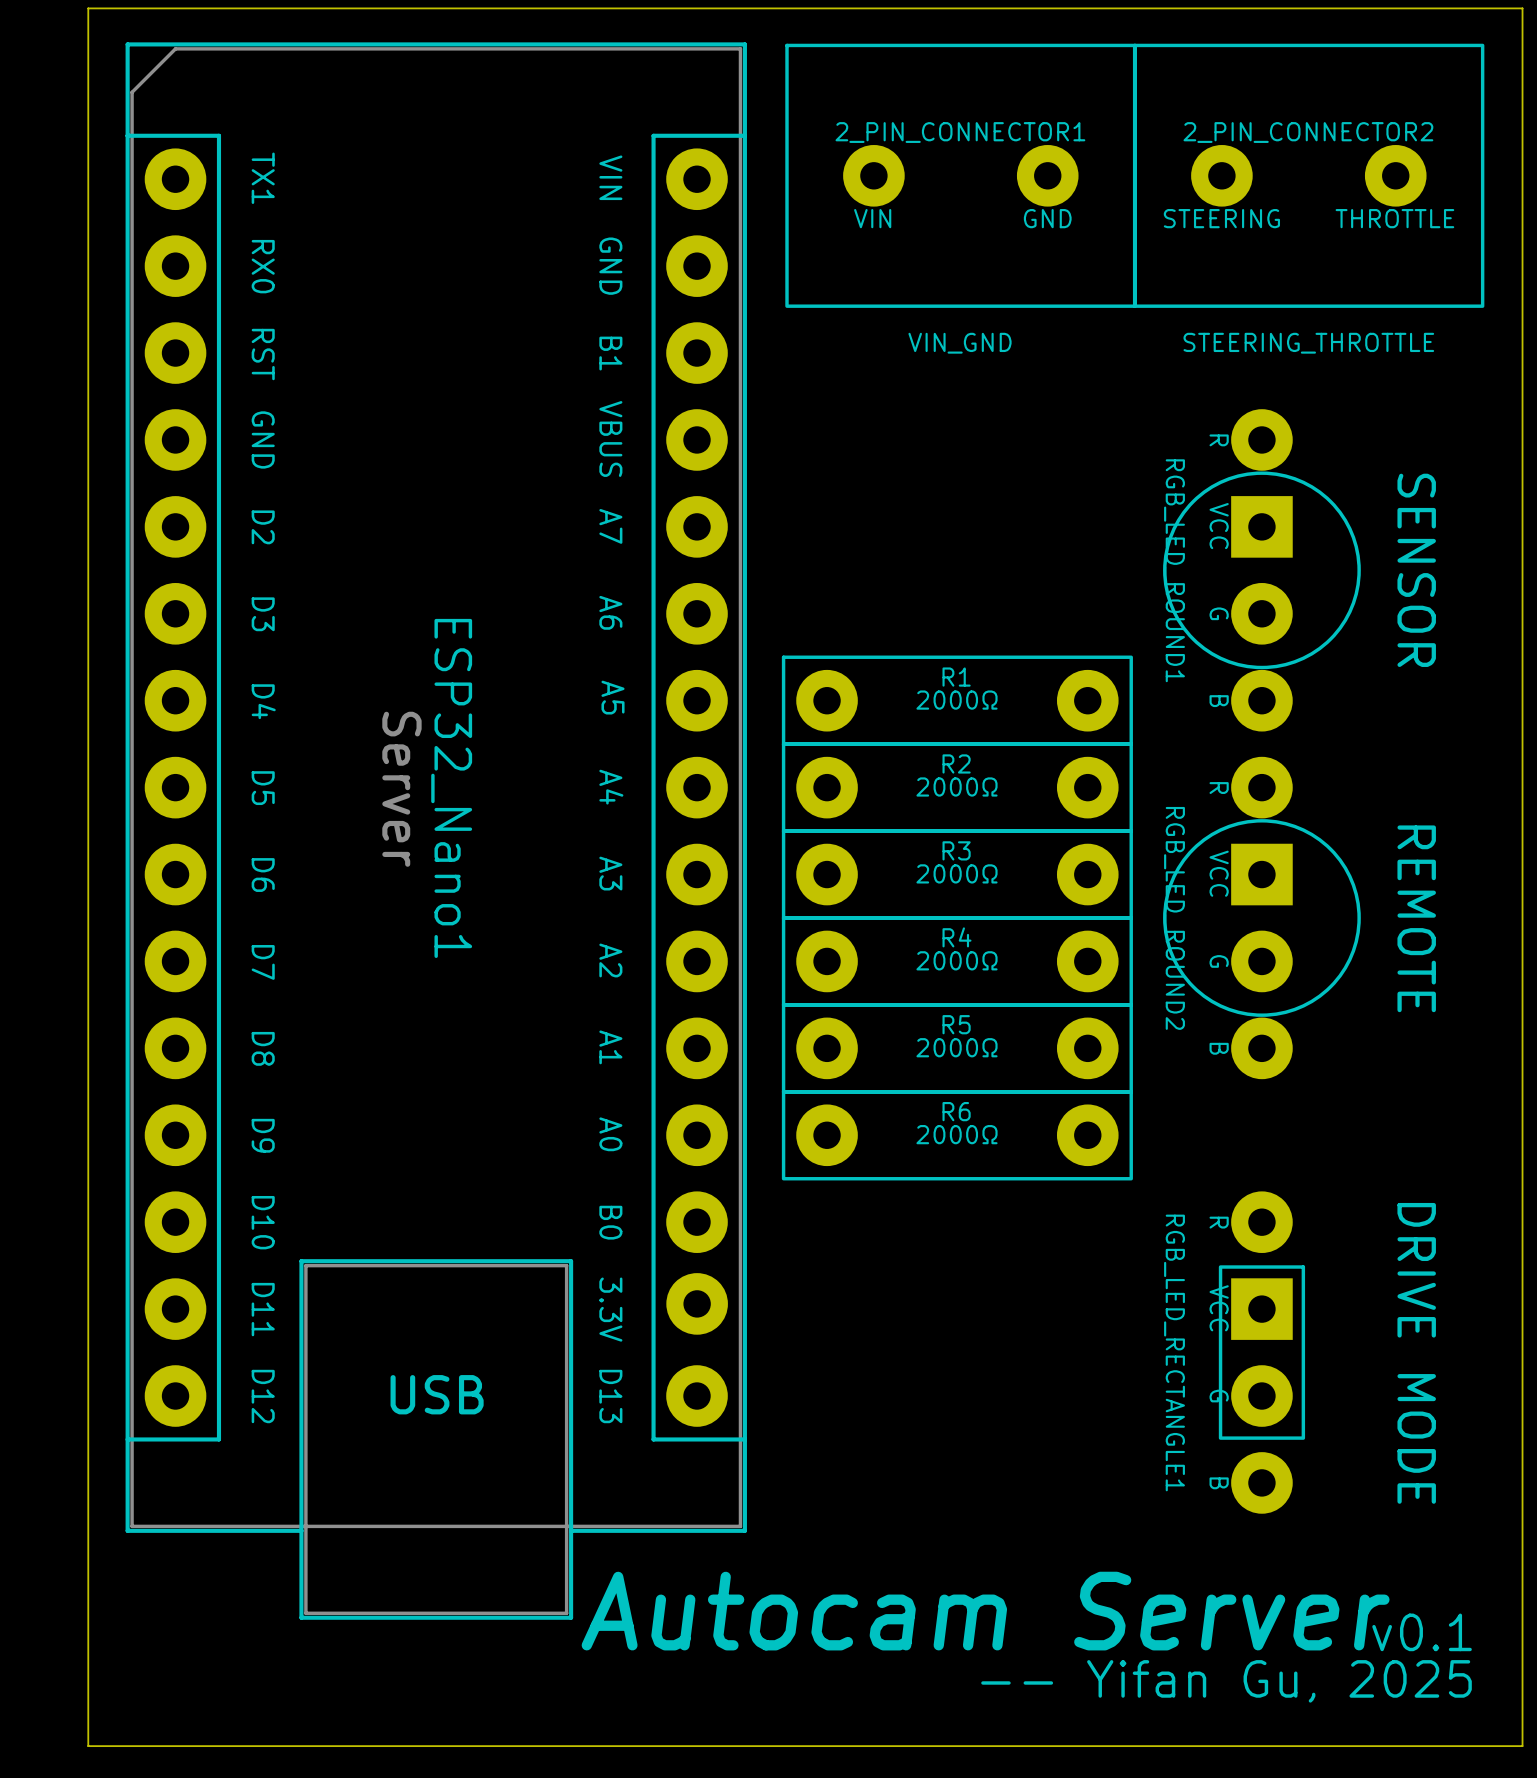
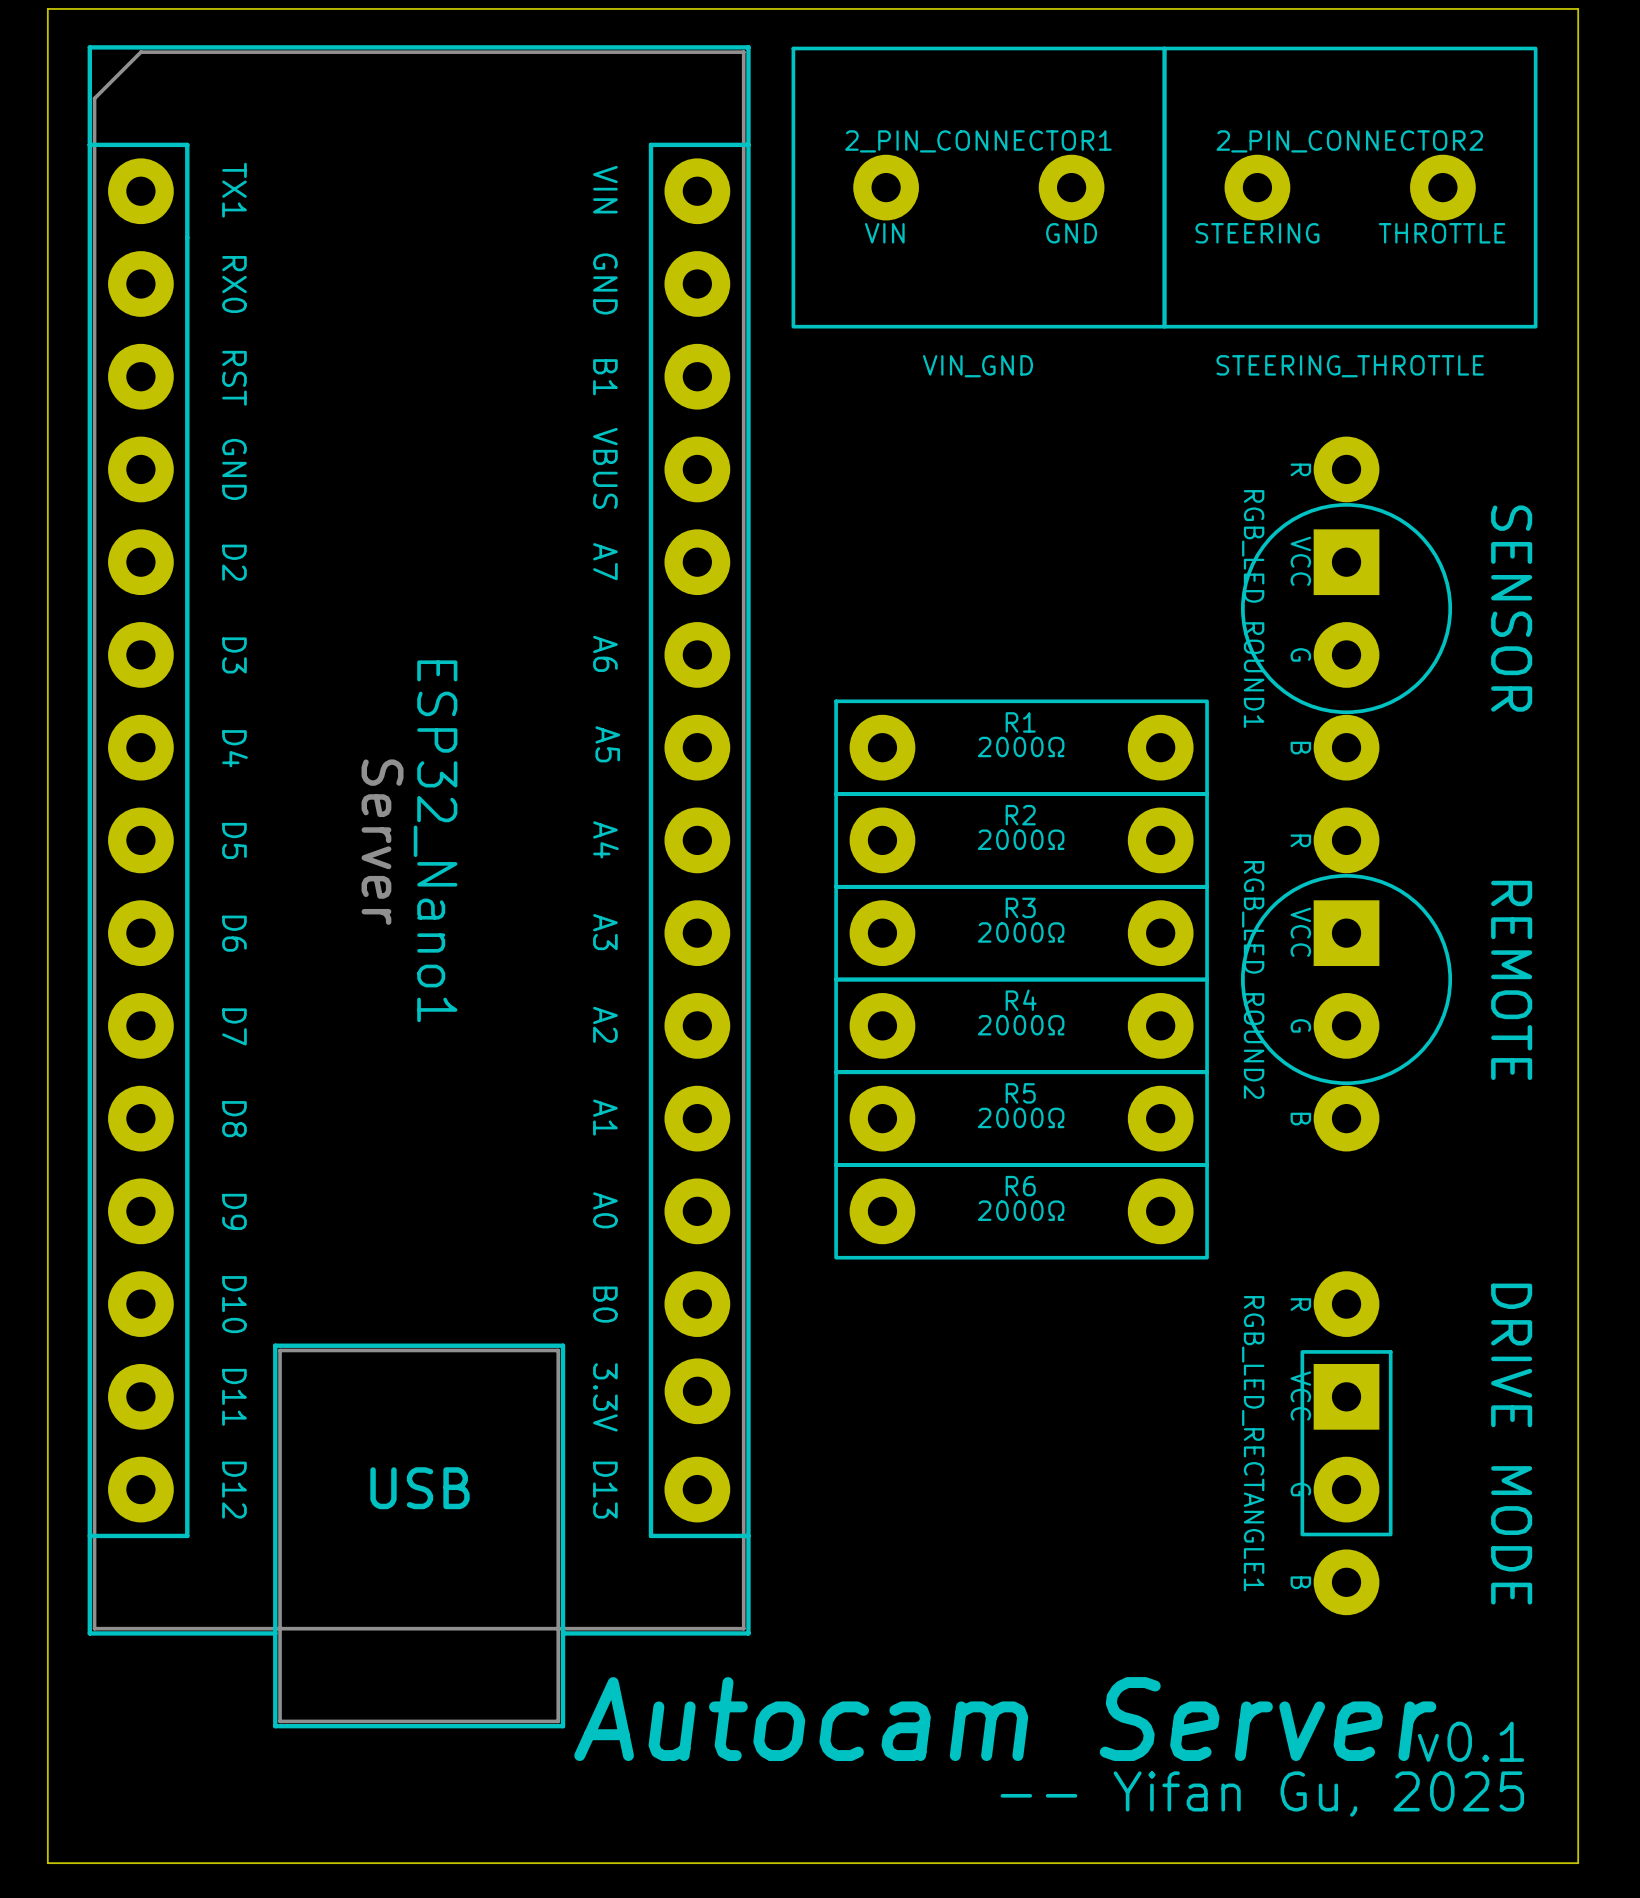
board edge: (88, 8) (88, 1746) -> (94, 8) (47, 8) (47, 1863) (94, 1863)
board edge: (1479, 8) (1522, 8) (1522, 1746) (1479, 1746) -> (1578, 8) (1578, 1863)
2_PIN_CONNECTOR1 position: (960, 175) -> (978, 187)
2_PIN_CONNECTOR2 position: (1308, 175) -> (1350, 187)
ESP32_Nano1 position: (436, 831) -> (419, 886)
text position: Autocam Server (985, 1611) -> Autocam Server (1005, 1719)
text position: v0.1 (1422, 1632) -> v0.1 (1470, 1741)
text position: -- Yifan Gu, 2025 (1226, 1681) -> -- Yifan Gu, 2025 (1262, 1794)

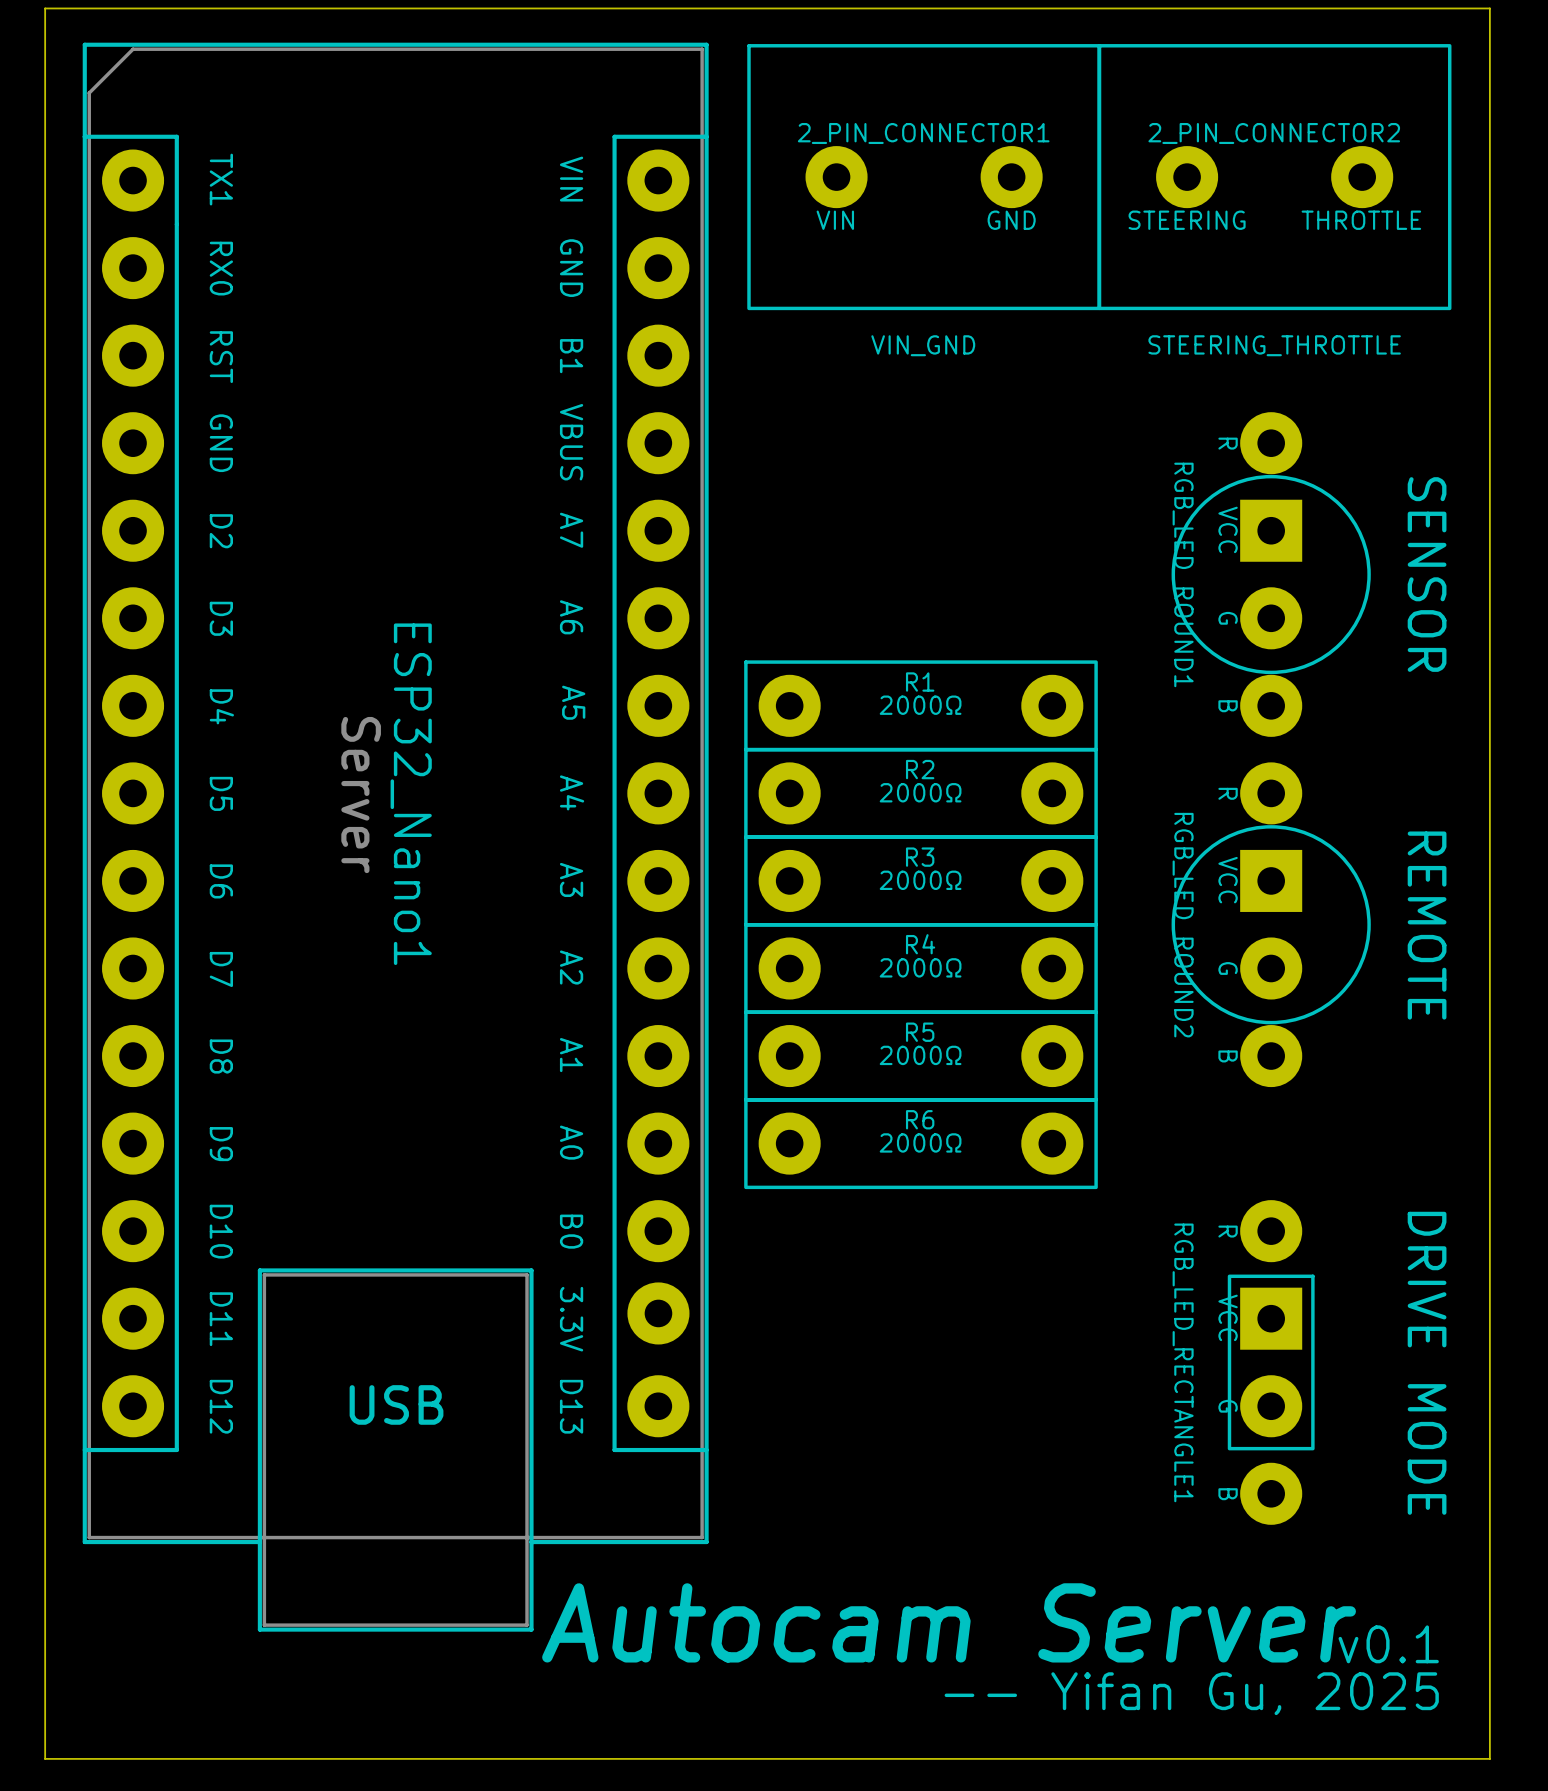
R1 position: (1021, 747) -> (920, 705)
R2 position: (1021, 840) -> (920, 793)
R3 position: (1021, 933) -> (920, 880)
R4 position: (1021, 1025) -> (920, 968)
R5 position: (1021, 1118) -> (920, 1056)
R6 position: (1021, 1211) -> (920, 1143)

